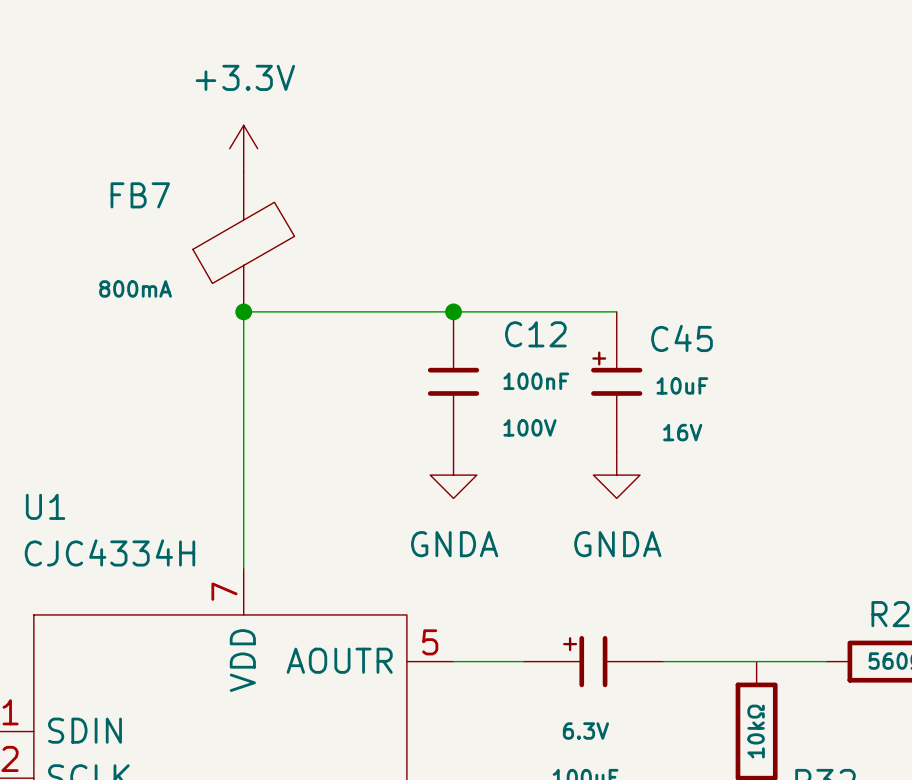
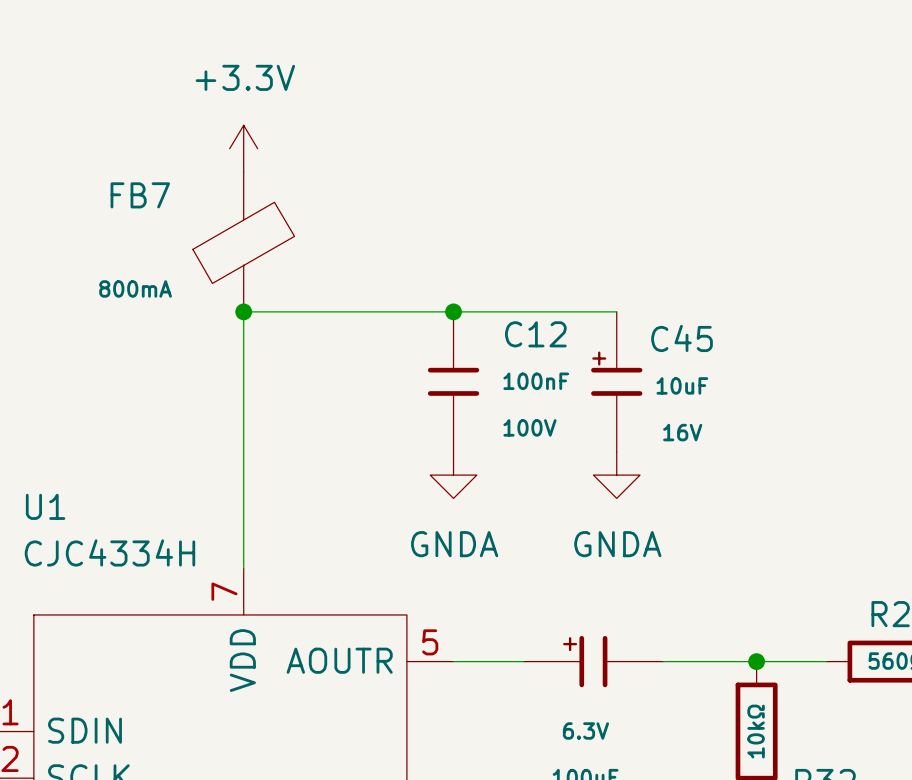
junction: none -> (756, 661)

